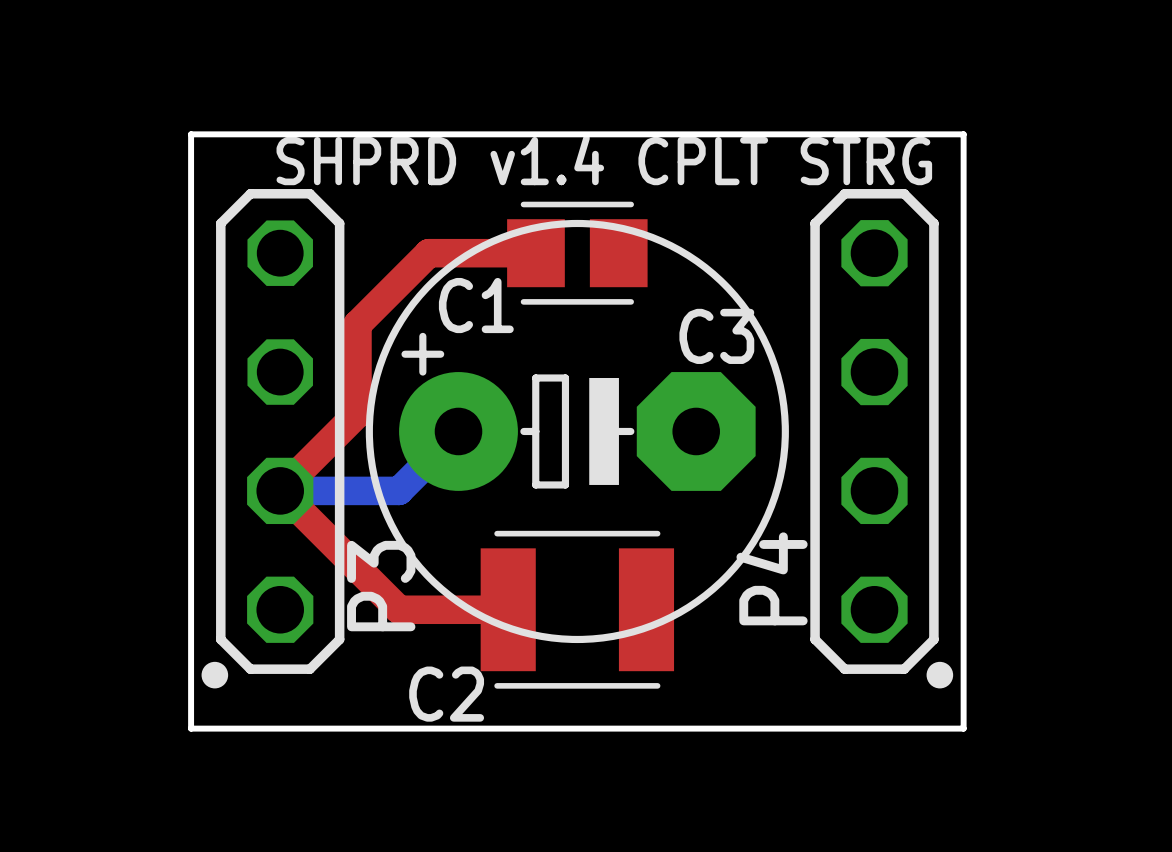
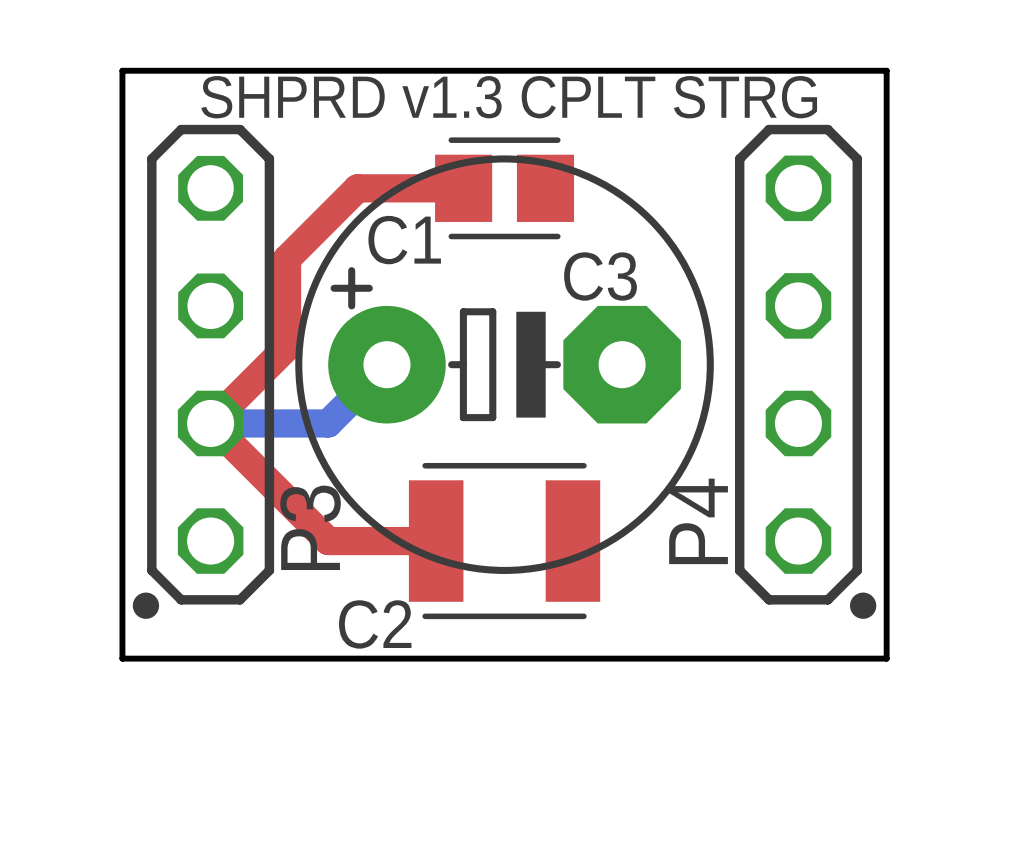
text: SHPRD v1.4 CPLT STRG (604, 160) -> SHPRD v1.3 CPLT STRG (509, 97)
C3 name position: C3 (716, 336) -> C3 (600, 276)

